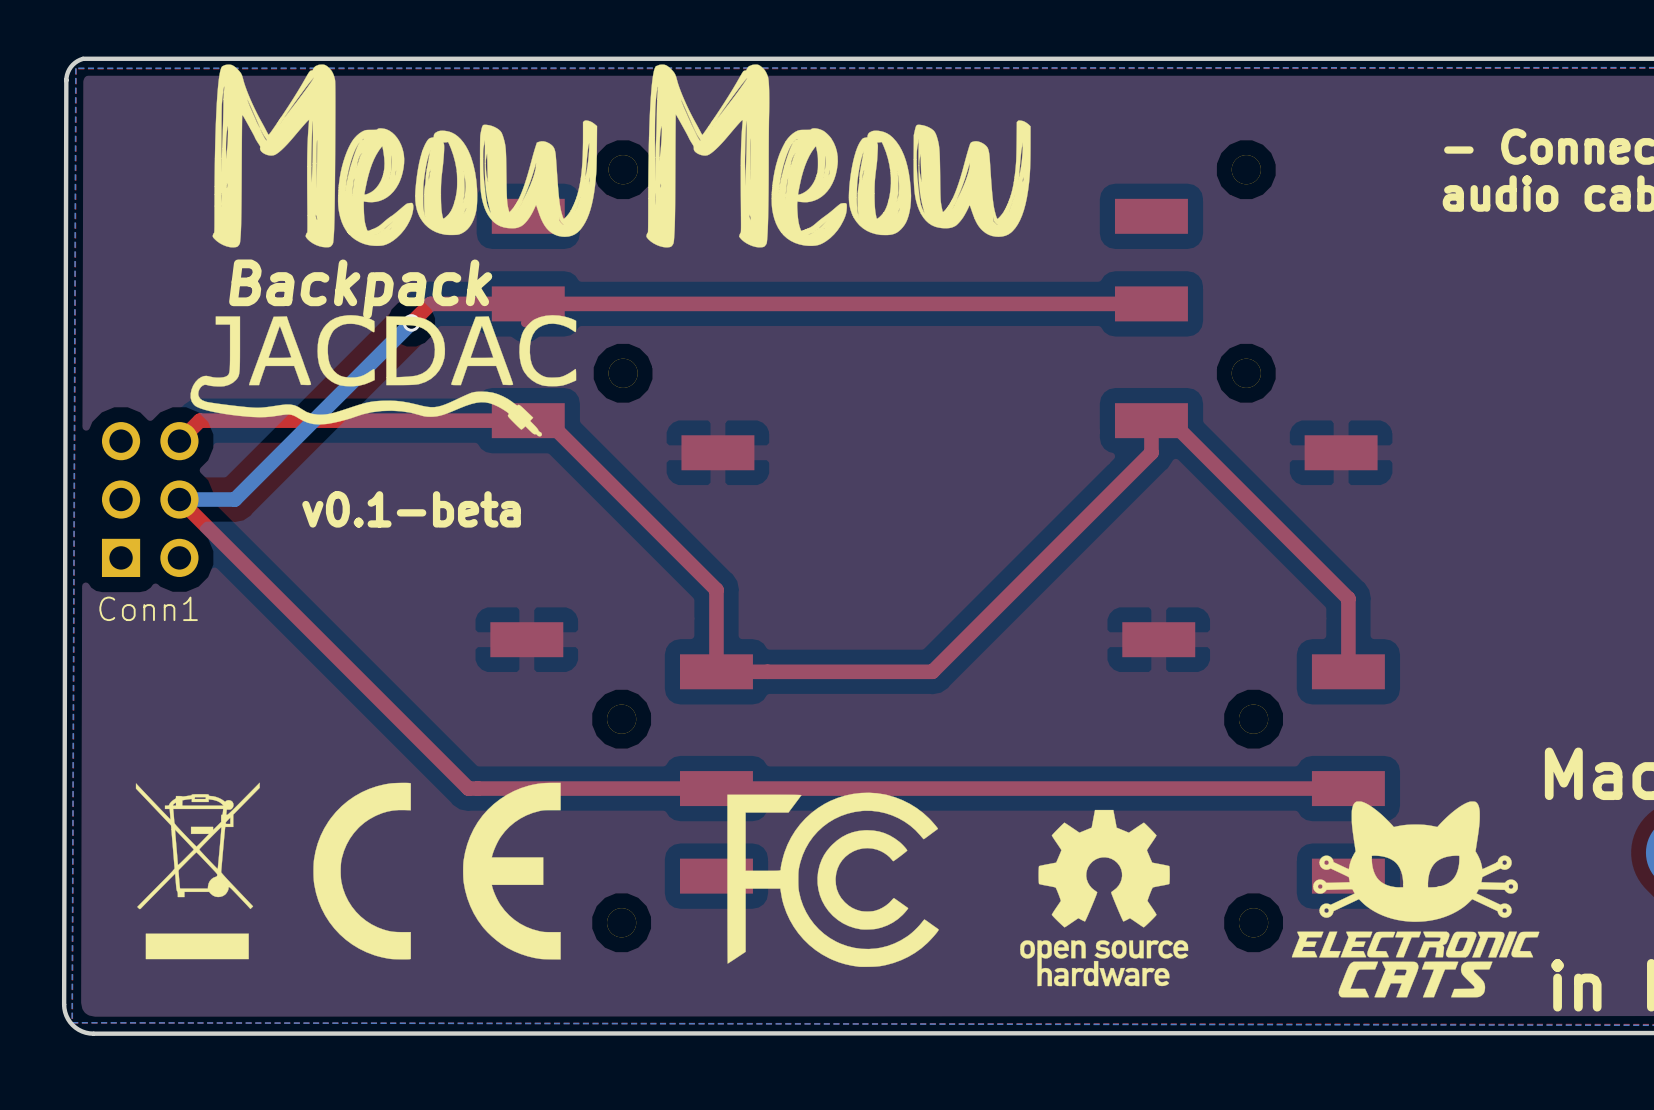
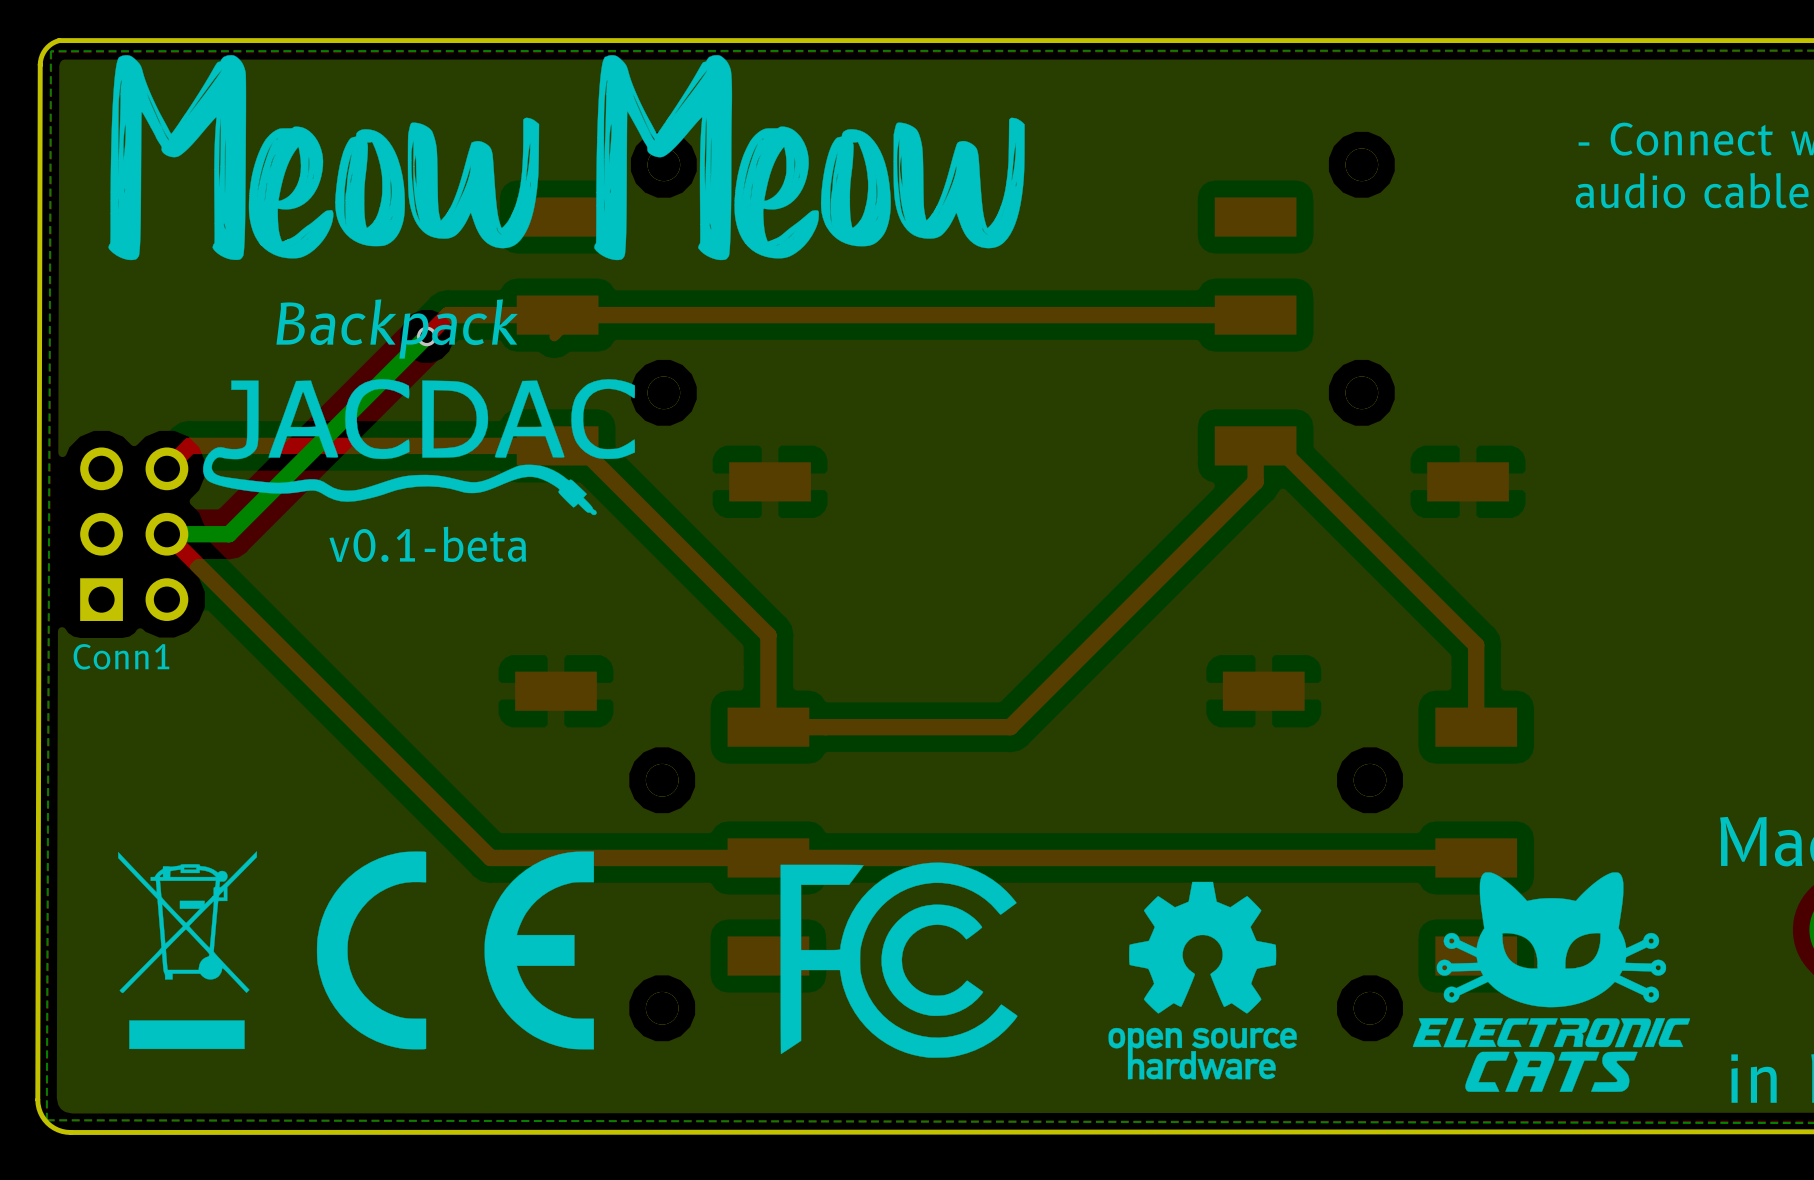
drawing position: (621, 155) -> (566, 157)
text position: Backpack (360, 289) -> Backpack (397, 329)
drawing position: (383, 375) -> (419, 447)

